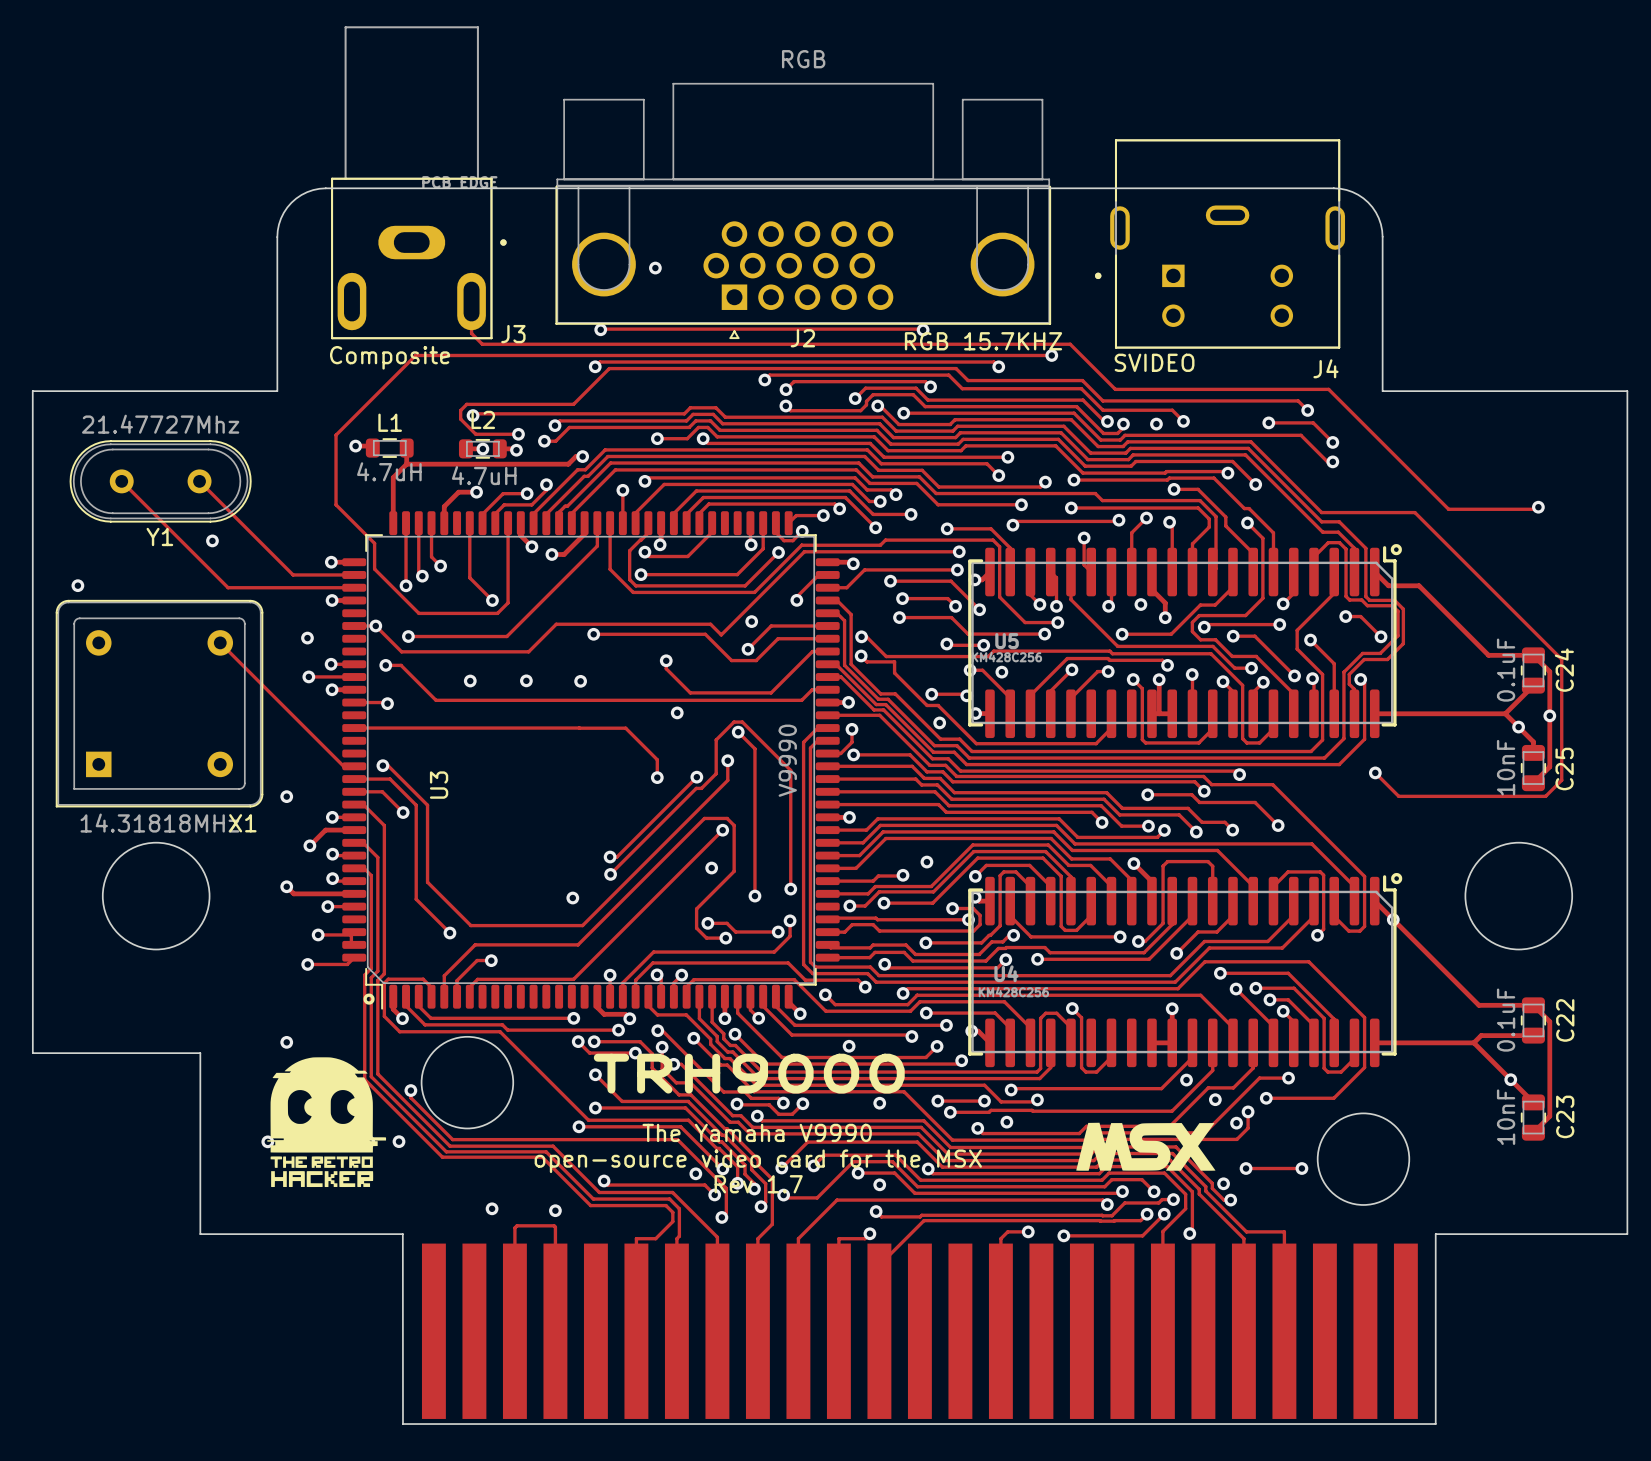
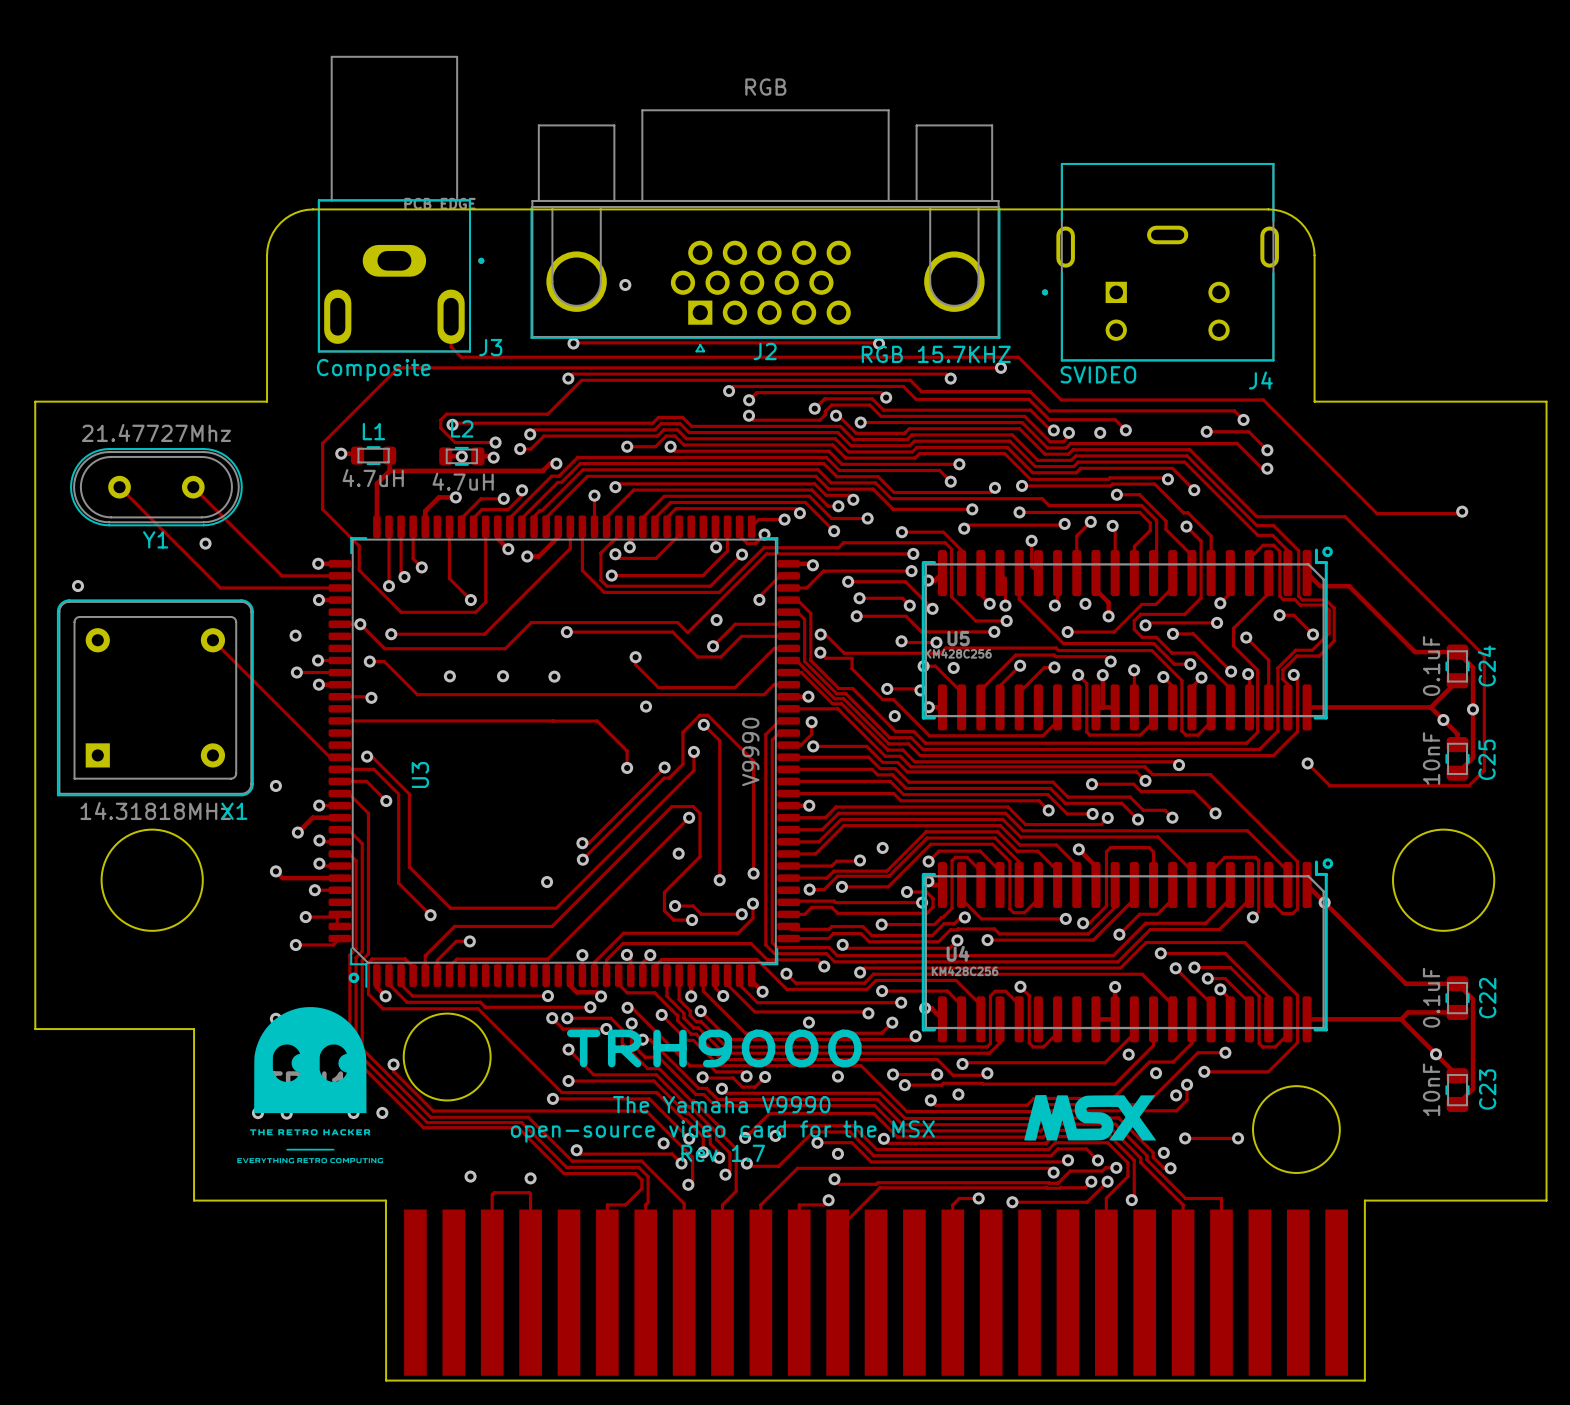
drawing: [267, 1057, 387, 1188] -> none
part: none -> (310, 1085)

